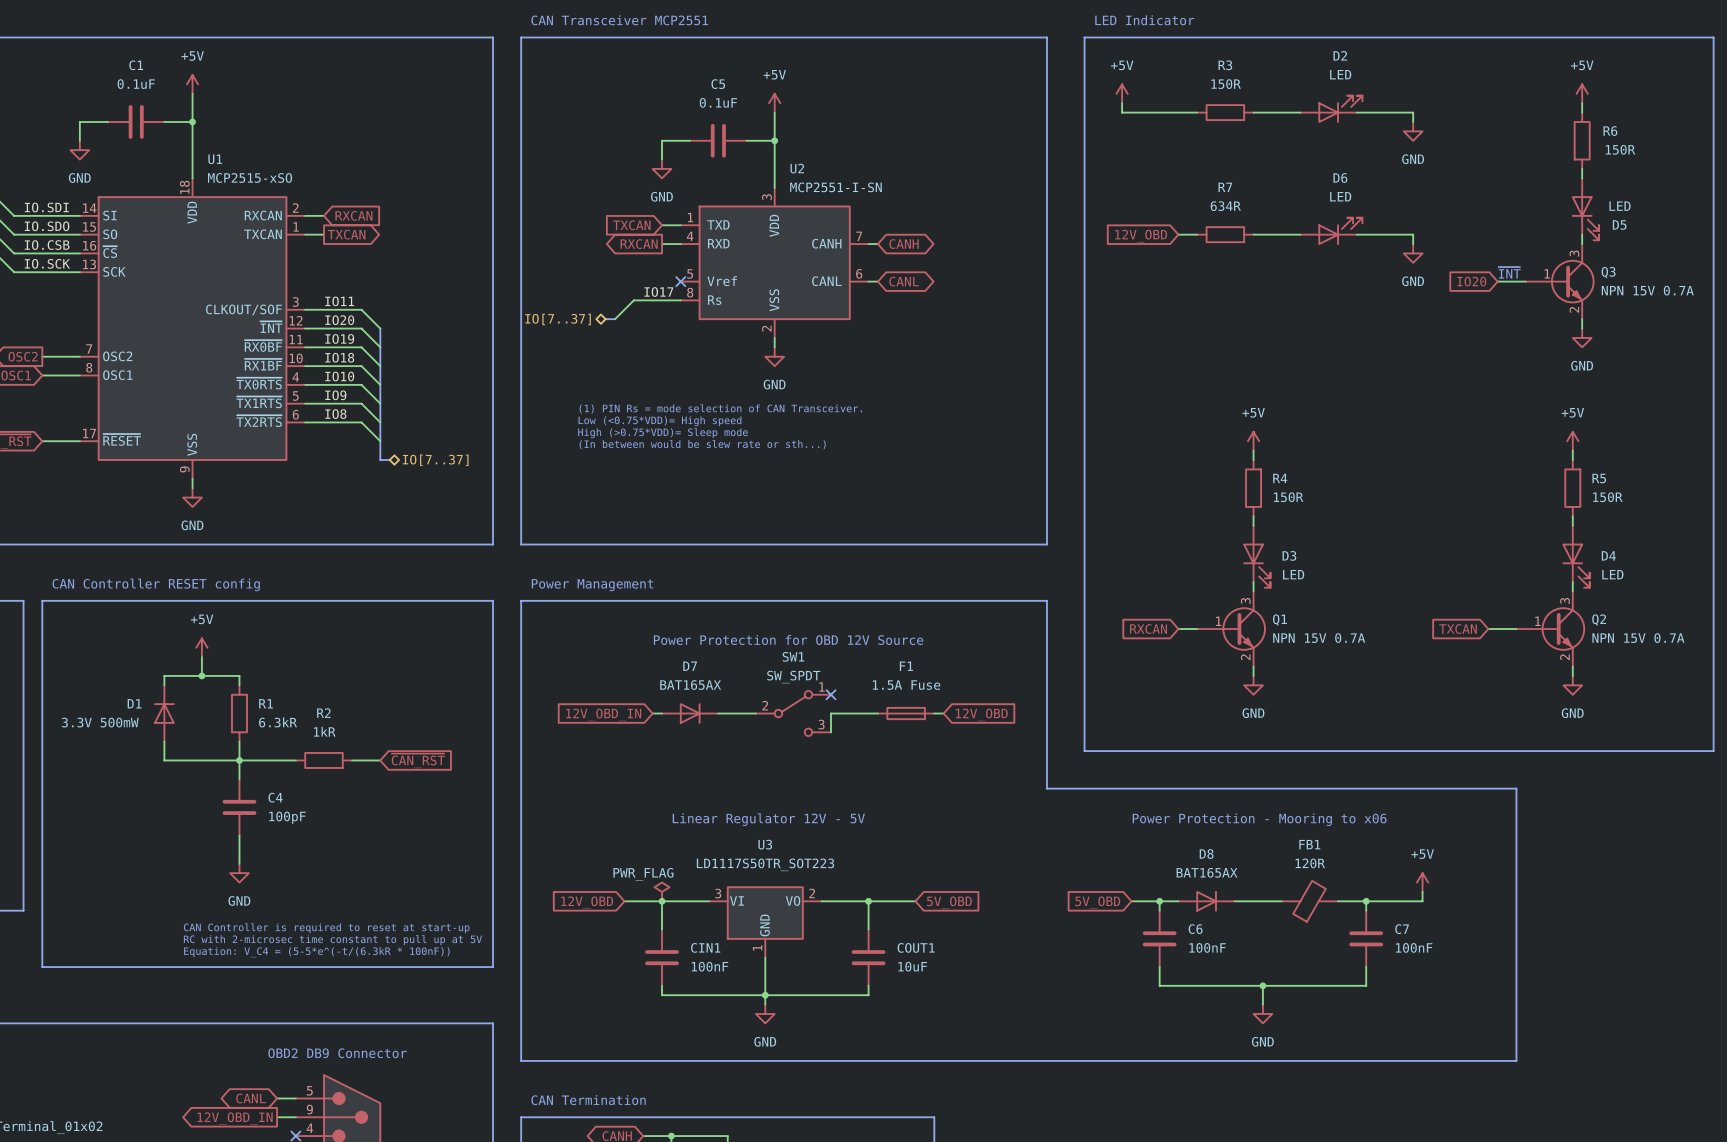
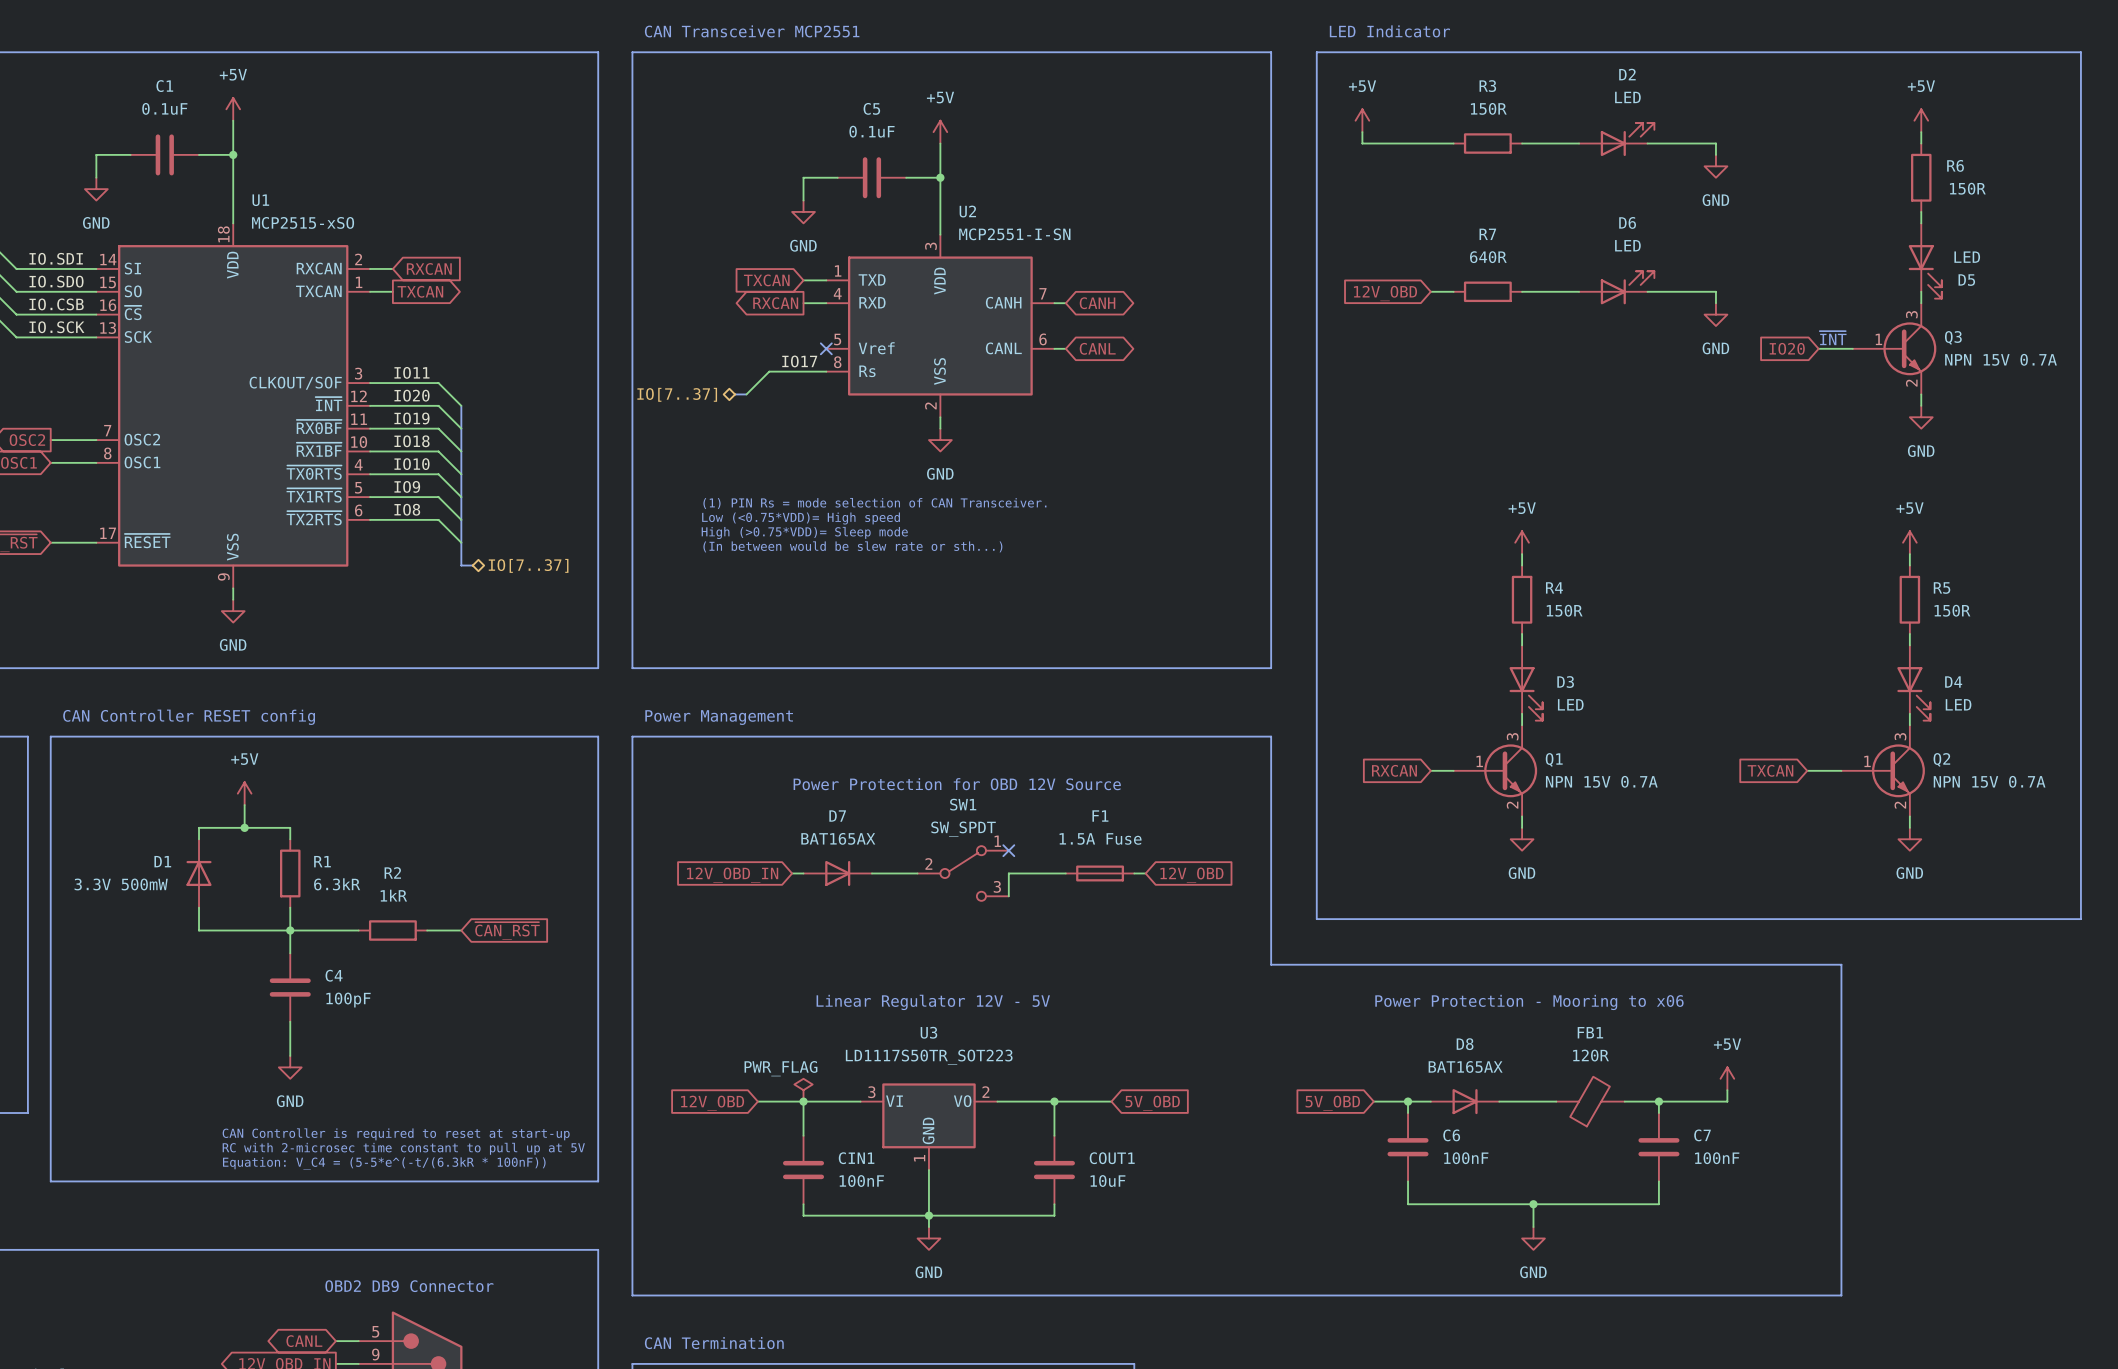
R7 value: 634R (1225, 206) -> 640R (1488, 257)

